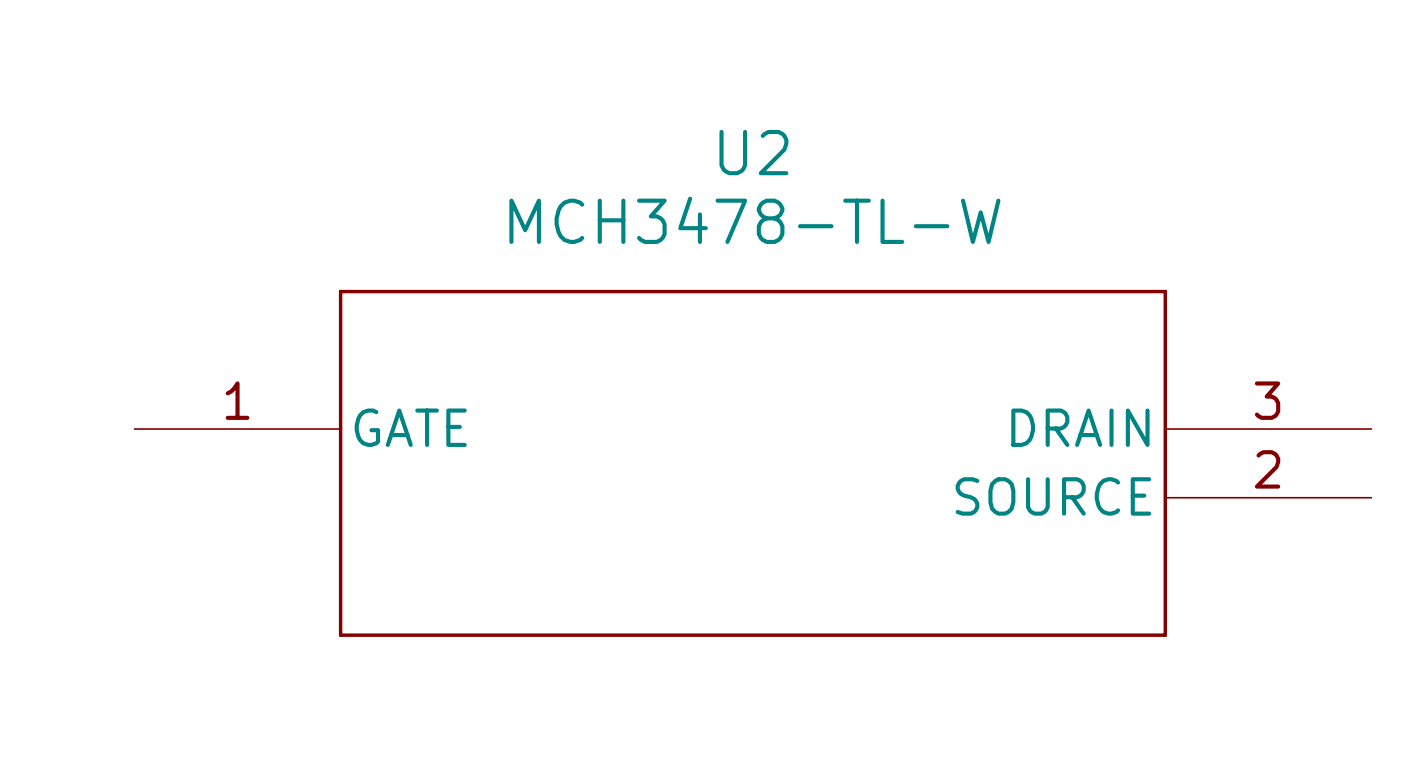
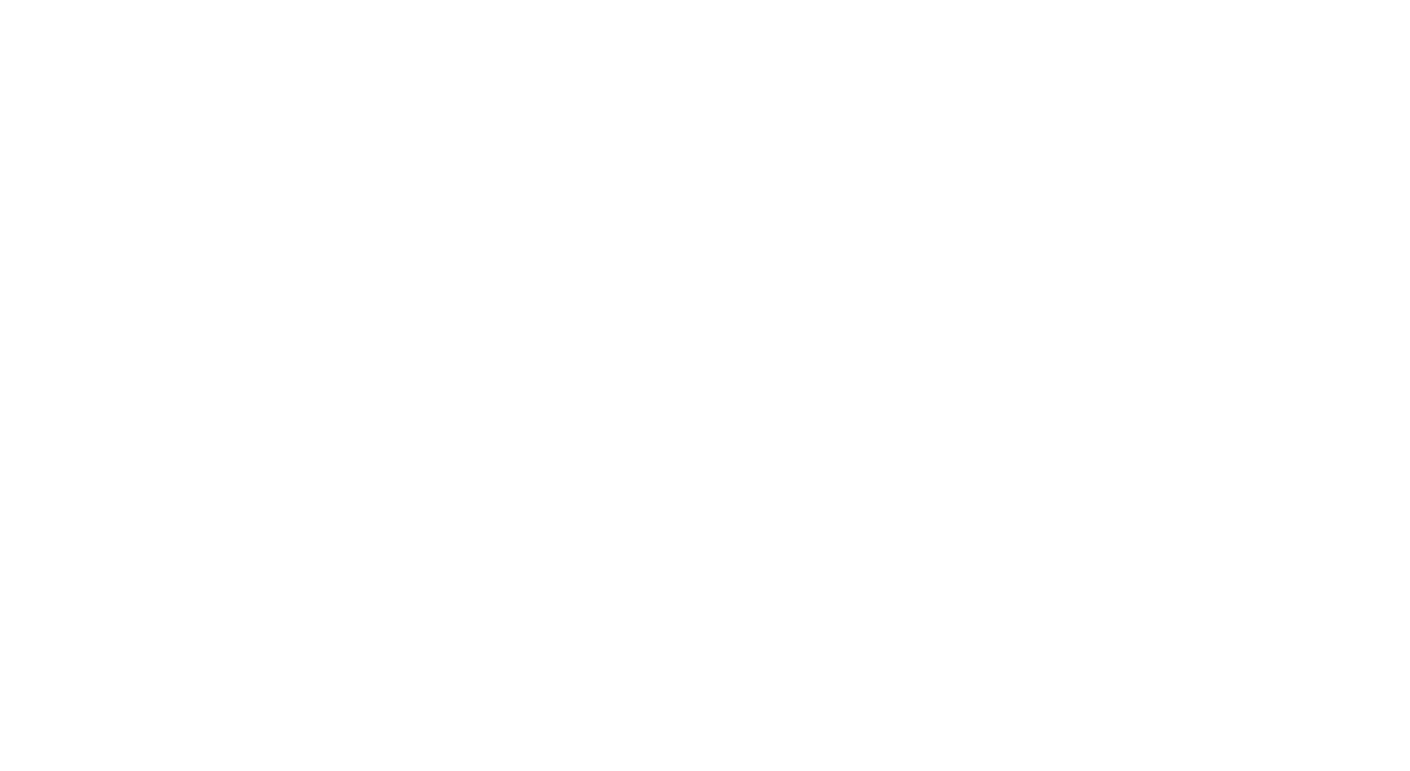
U2: MCH3478-TL-W (752, 463) -> none

